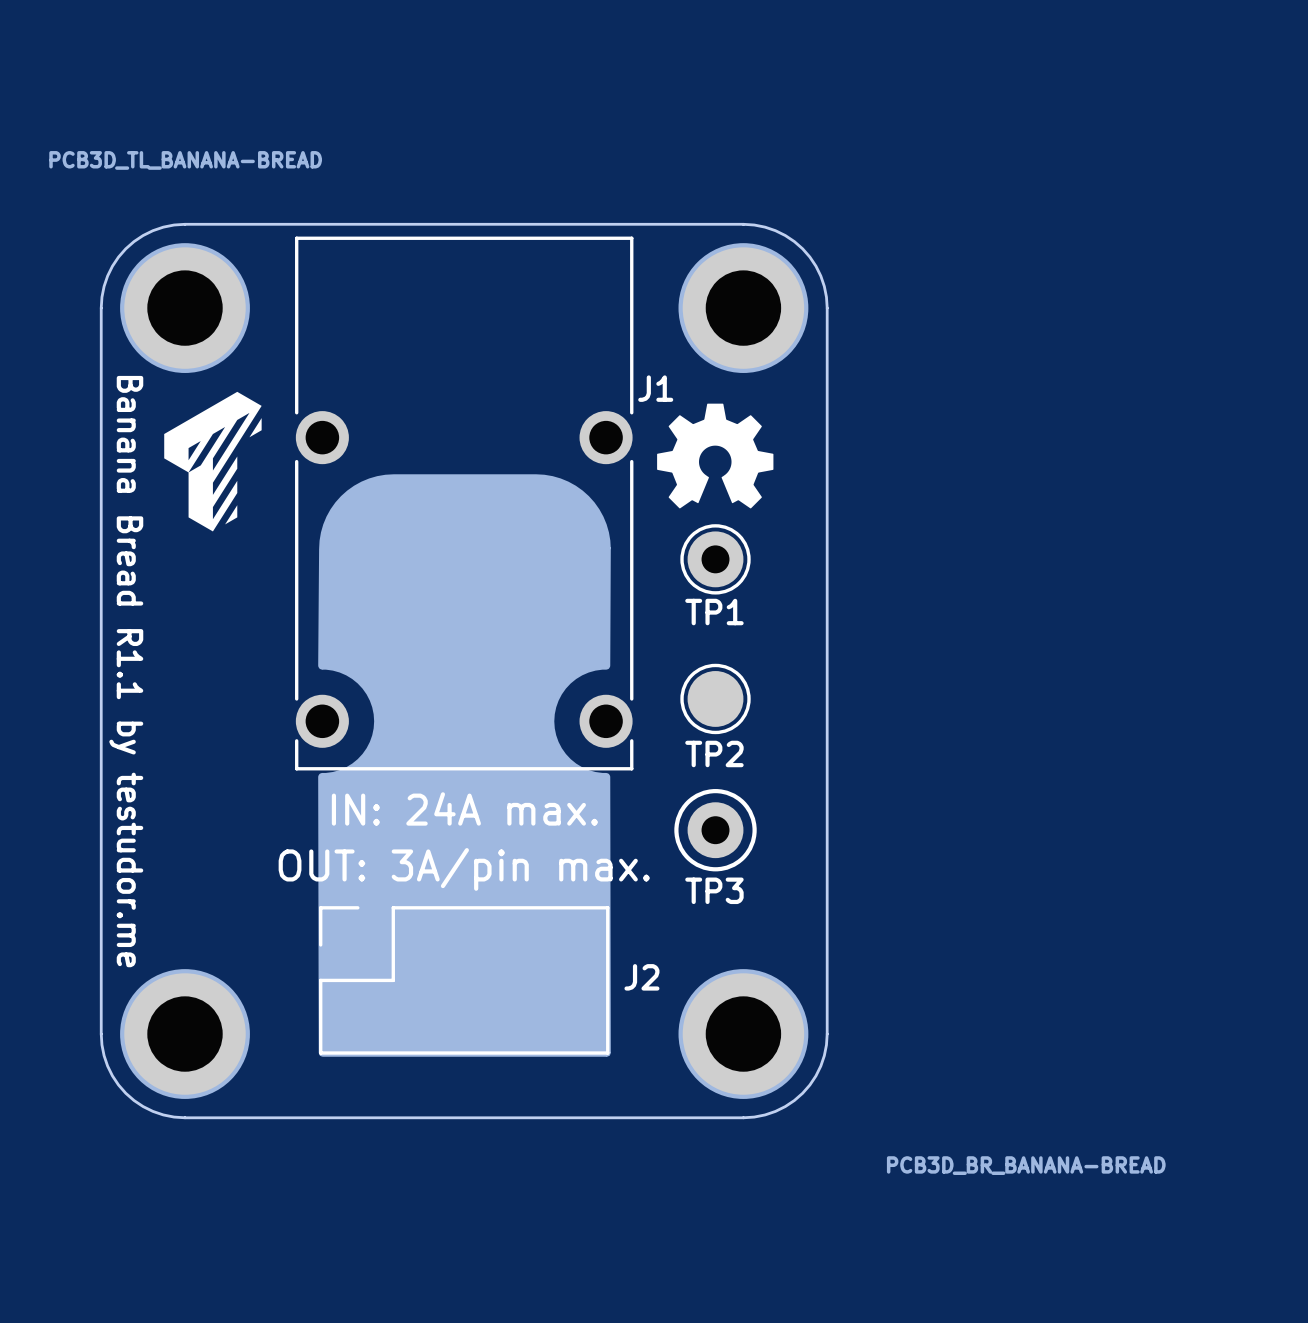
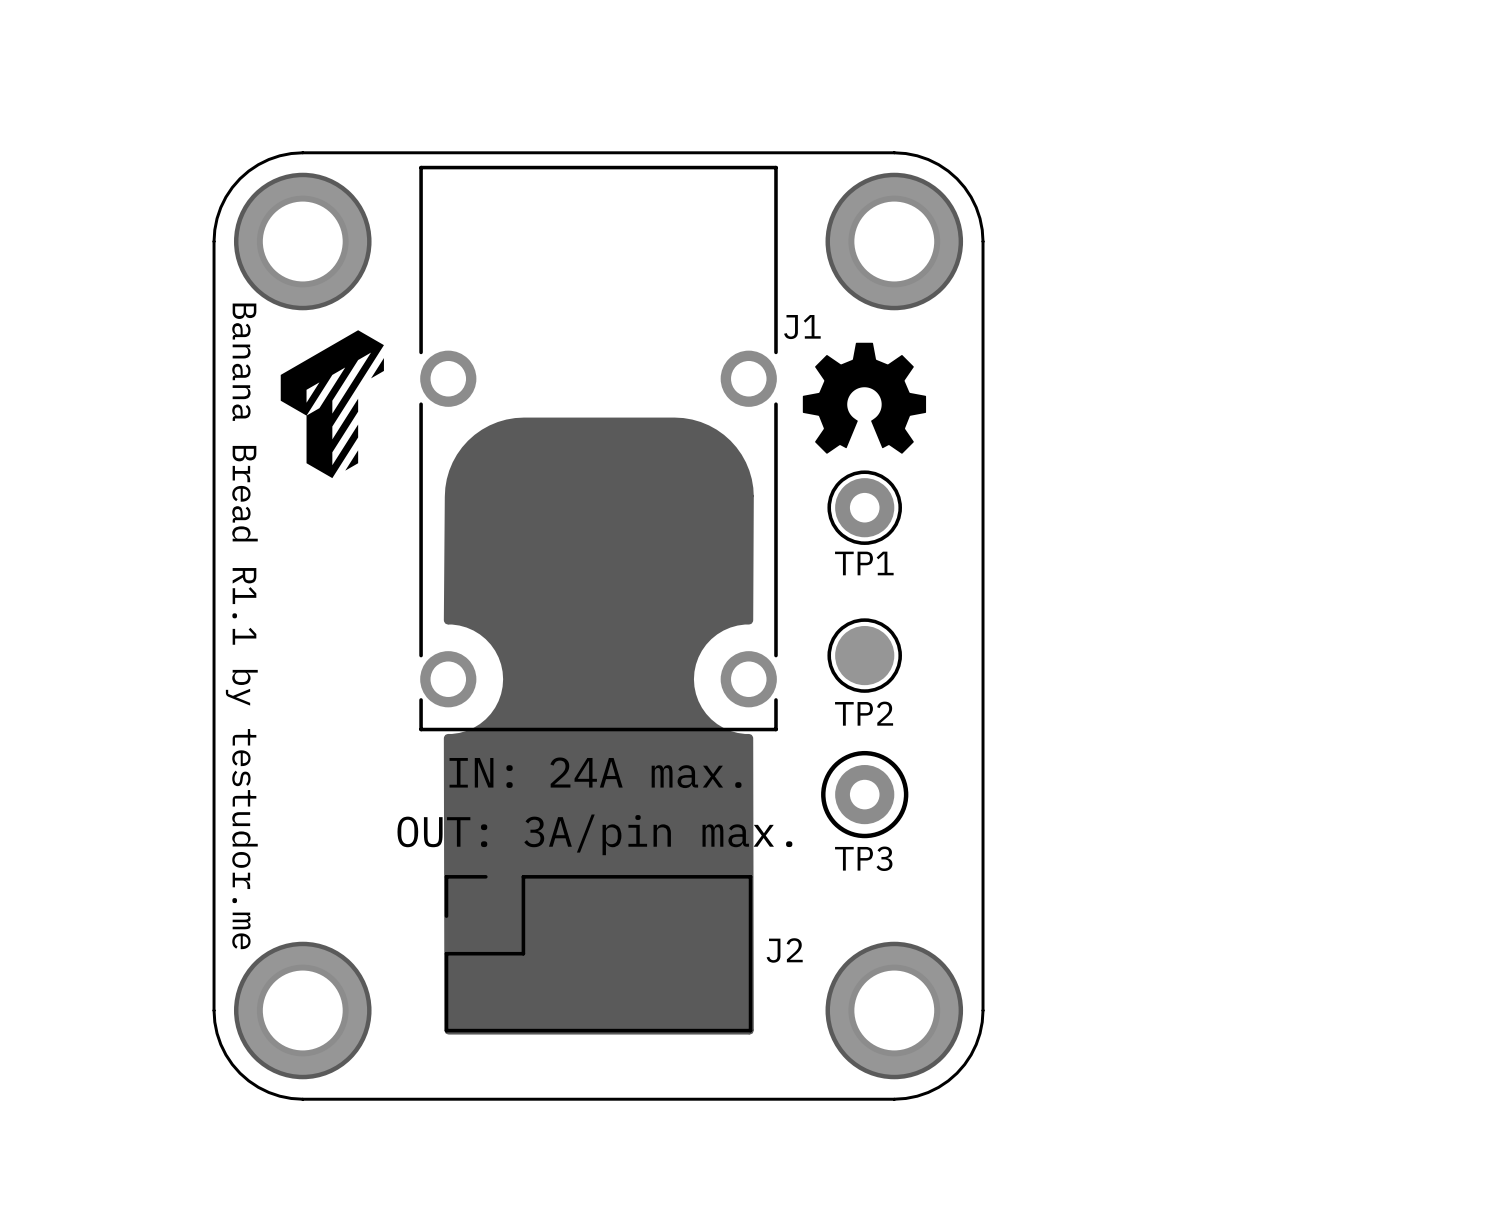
text: PCB3D_TL_BANANA-BREAD (185, 160) -> none
text: PCB3D_BR_BANANA-BREAD (1026, 1165) -> none

